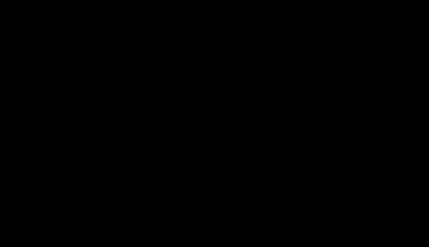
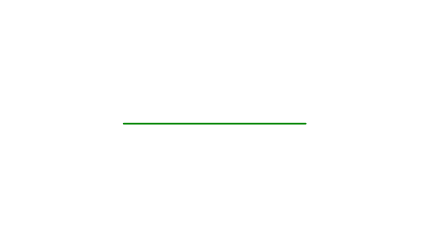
wire: none -> (123, 123) (305, 123)

